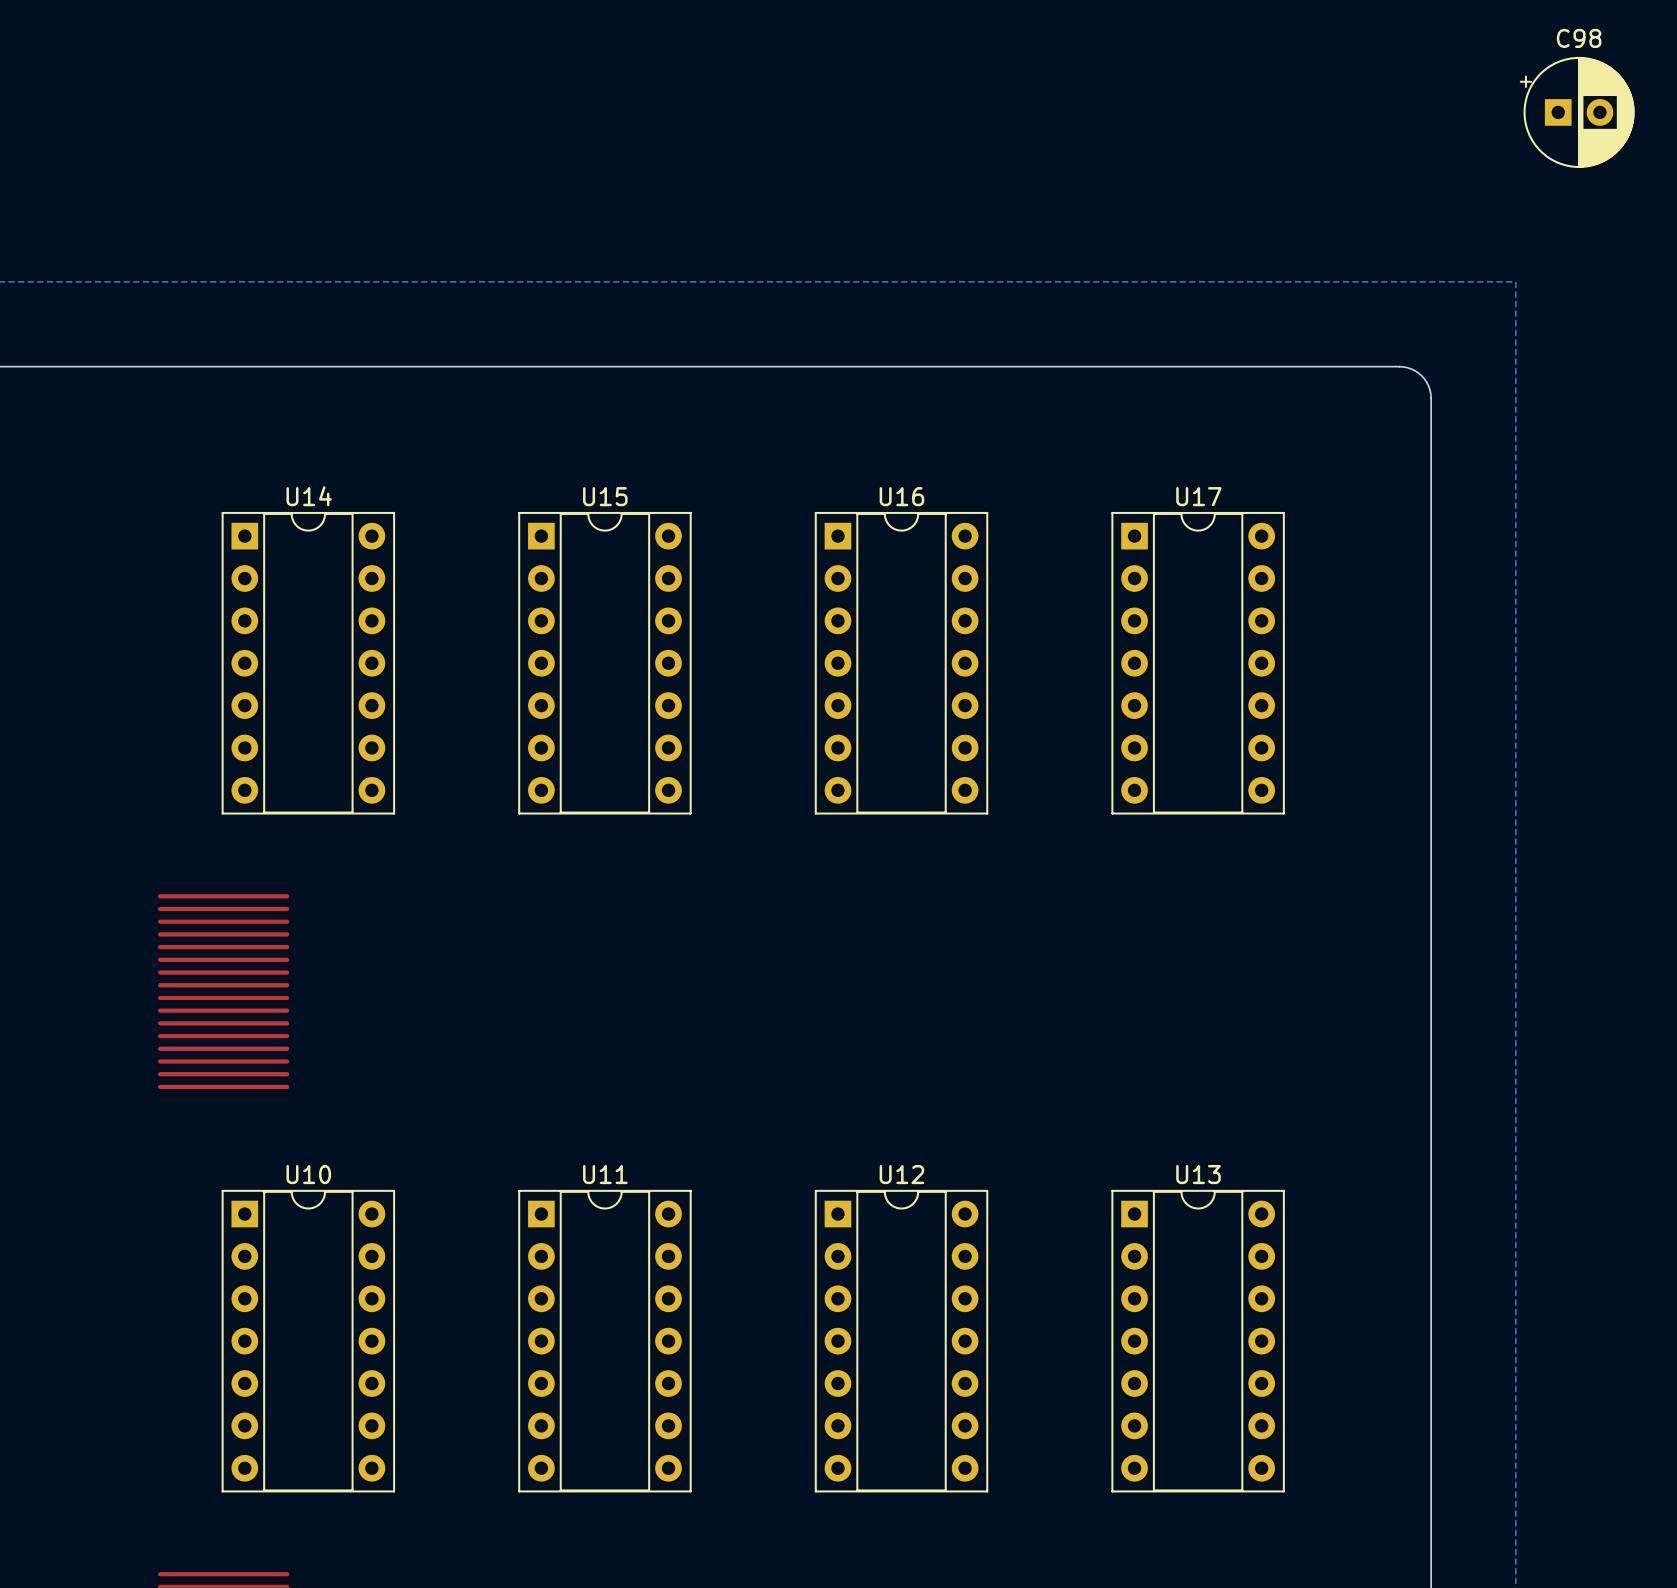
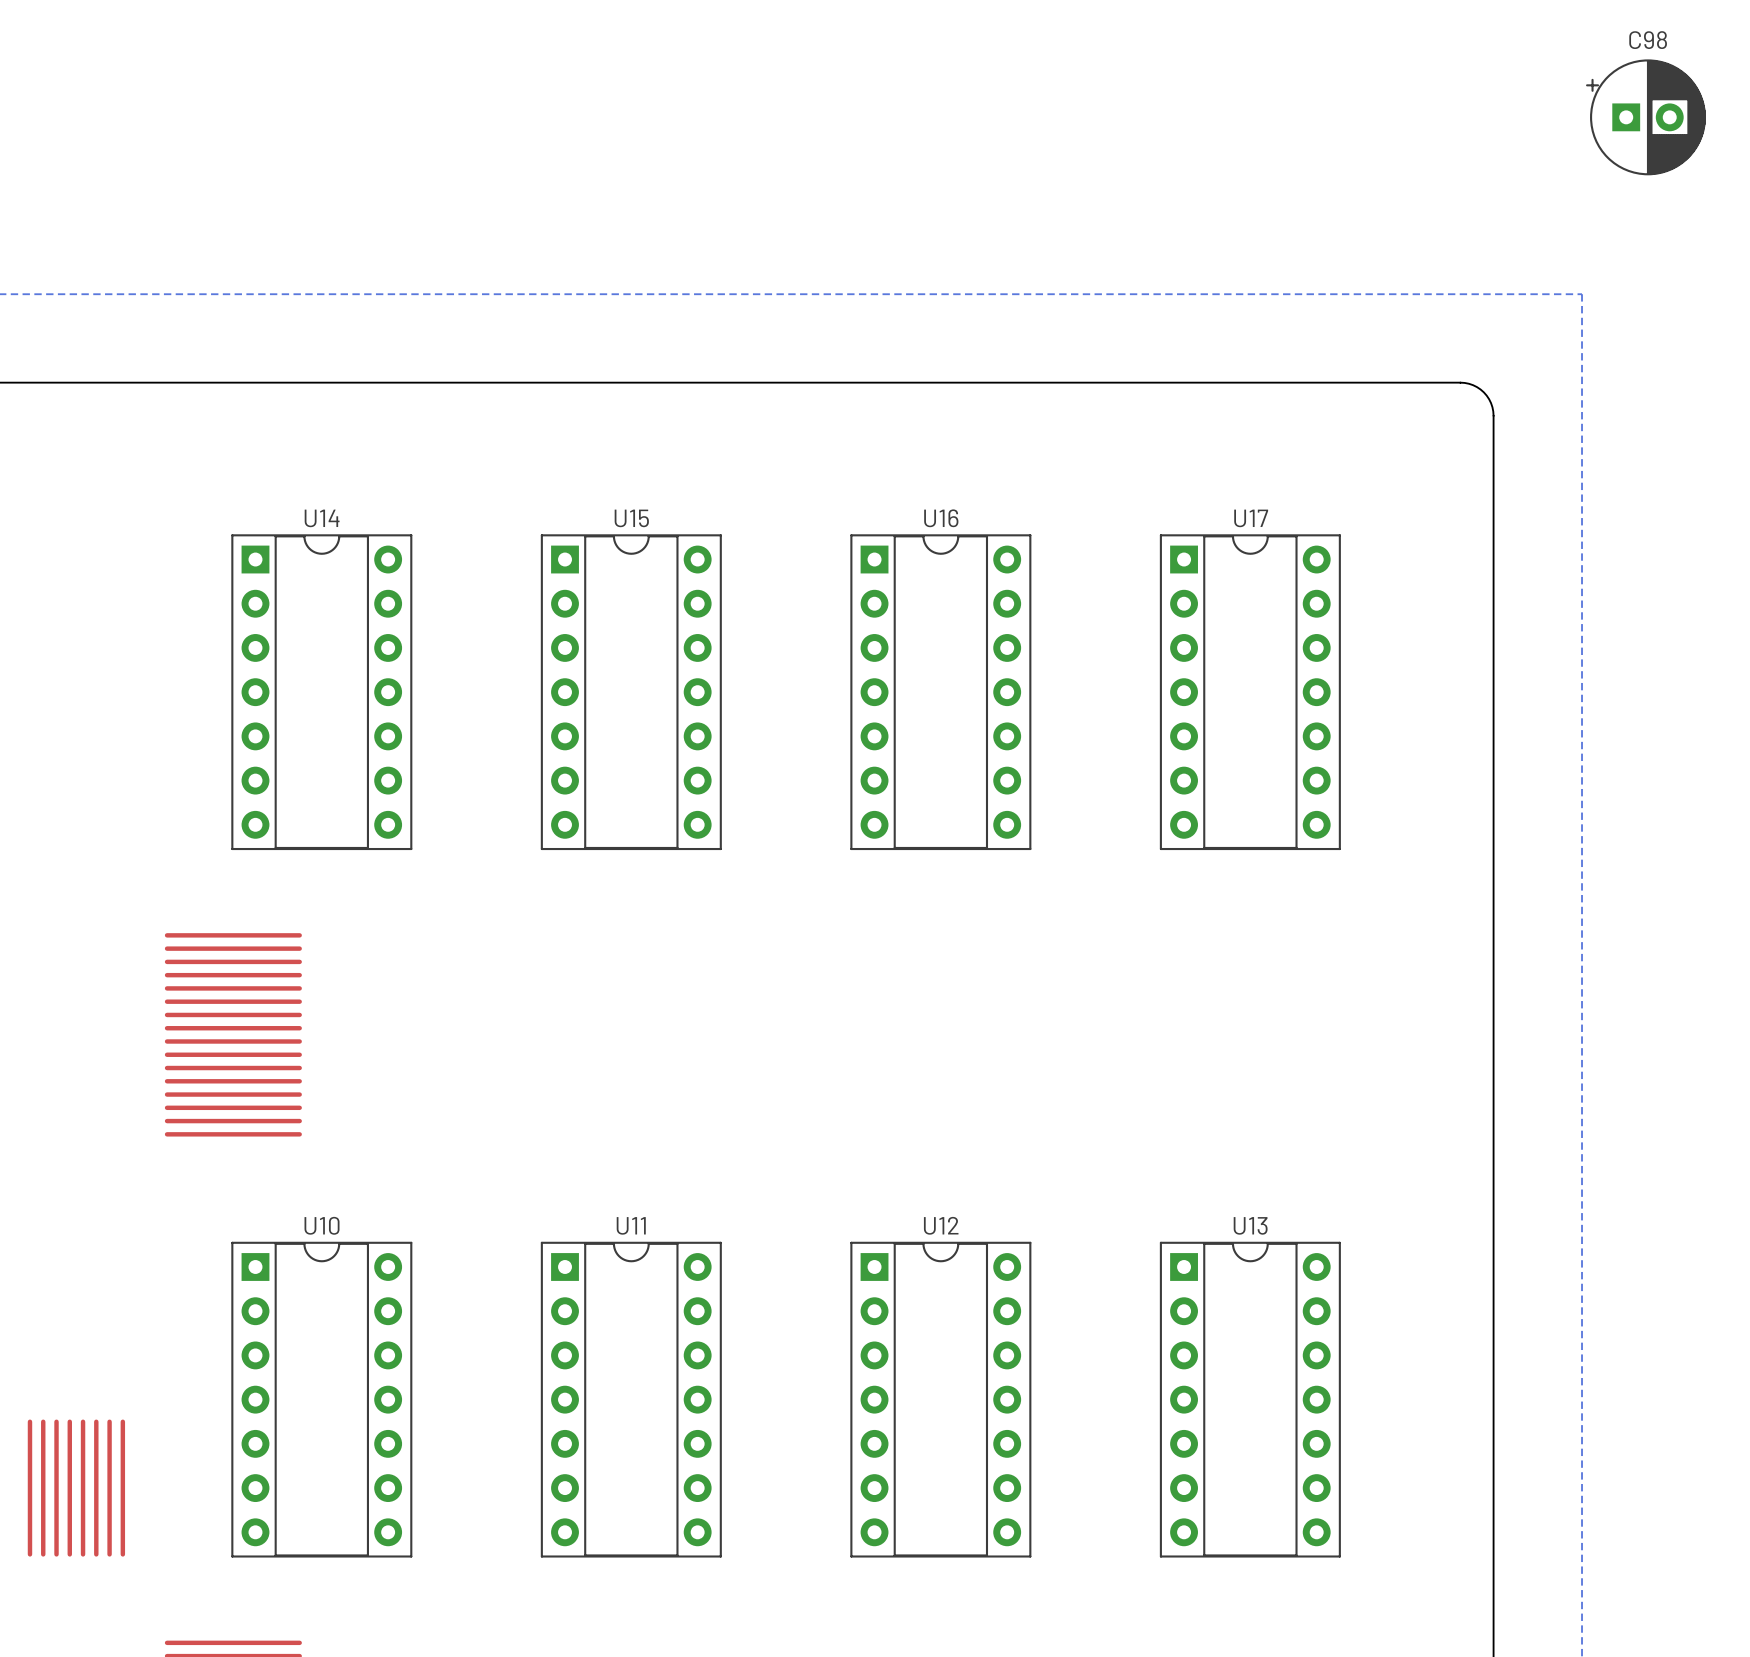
top track: none -> (29, 1421) (29, 1554)
top track: none -> (43, 1421) (43, 1554)
top track: none -> (56, 1421) (56, 1554)
top track: none -> (69, 1421) (69, 1554)
top track: none -> (83, 1421) (83, 1554)
top track: none -> (96, 1421) (96, 1554)
top track: none -> (109, 1421) (109, 1554)
top track: none -> (122, 1421) (122, 1554)

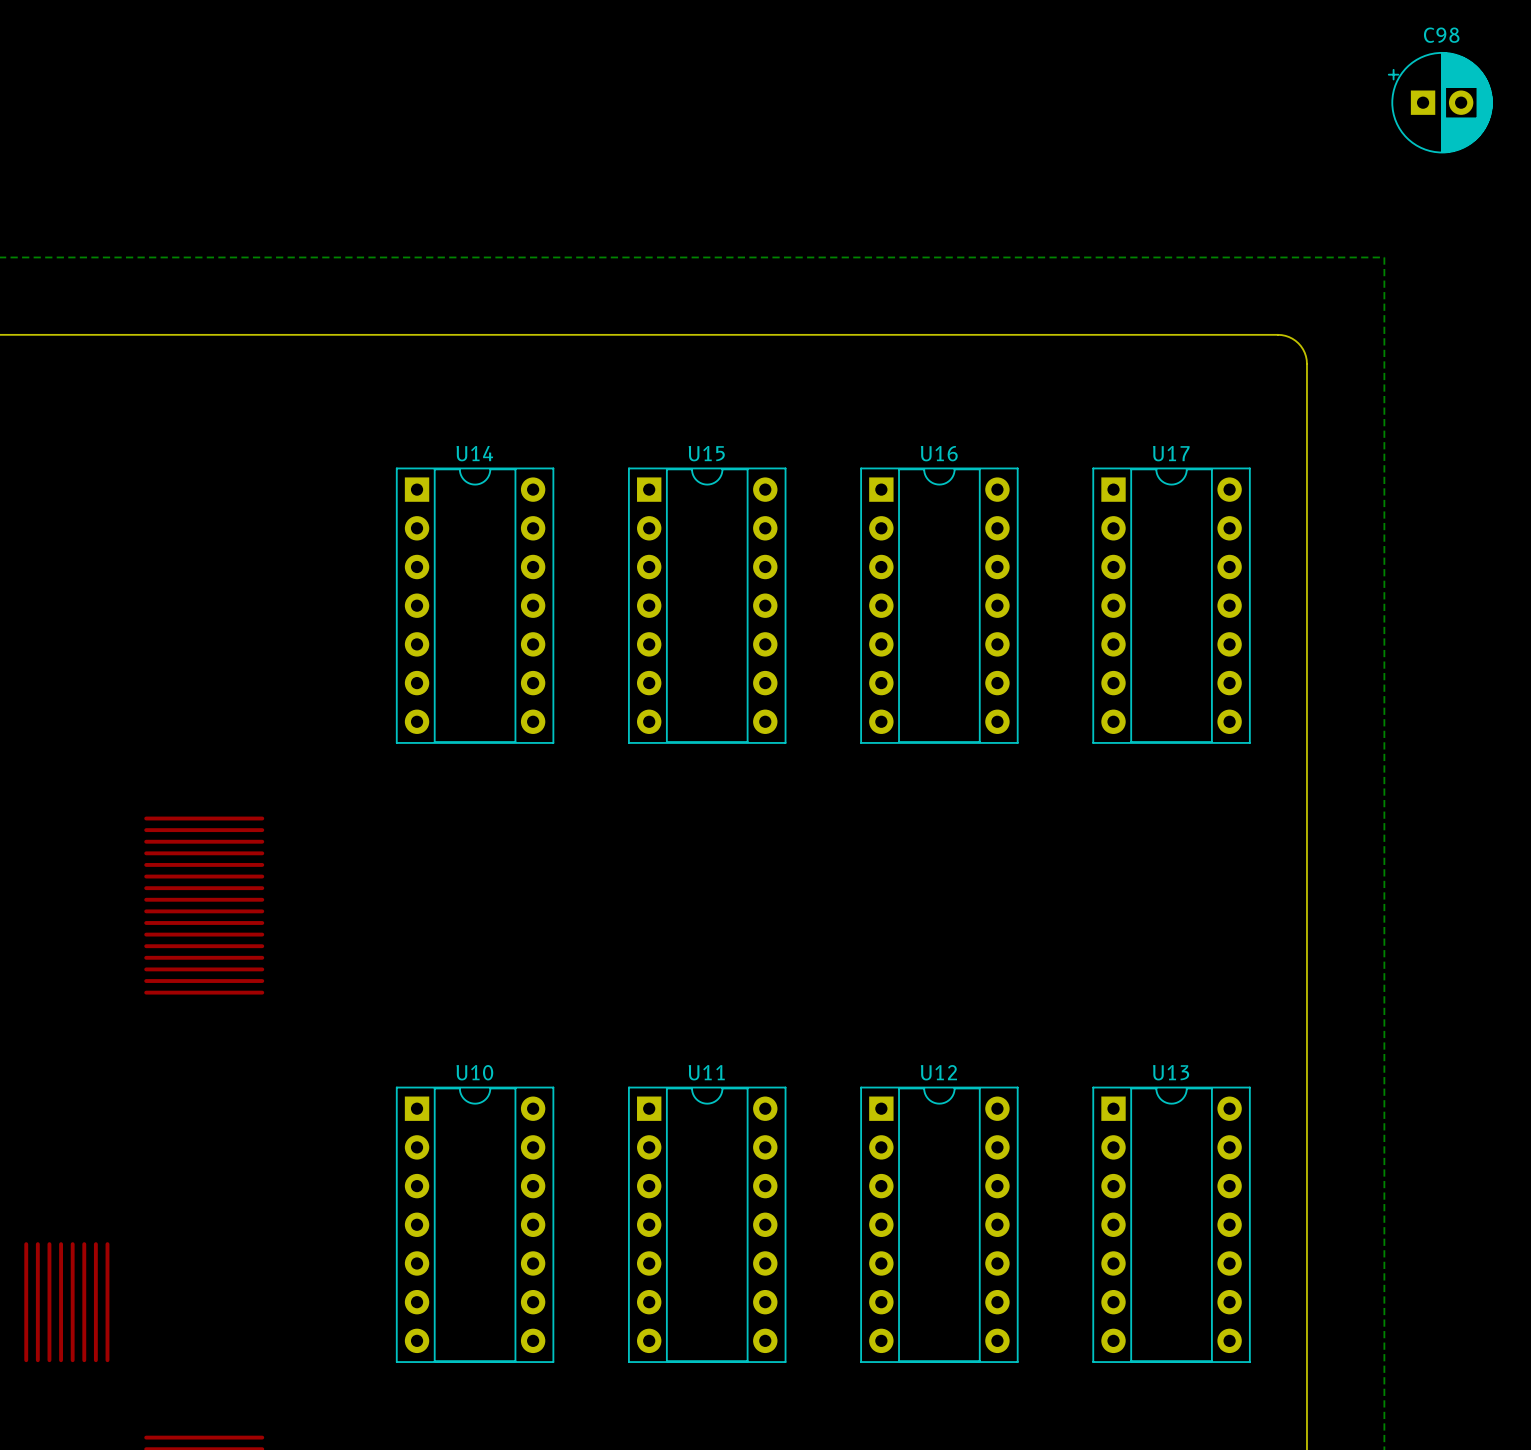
U14 position: (321, 692) -> (475, 605)
U15 position: (631, 692) -> (707, 605)
U16 position: (940, 692) -> (939, 605)
U17 position: (1250, 692) -> (1171, 605)
U10 position: (321, 1399) -> (475, 1224)
U11 position: (631, 1399) -> (707, 1224)
U12 position: (940, 1399) -> (939, 1224)
U13 position: (1250, 1399) -> (1171, 1224)

